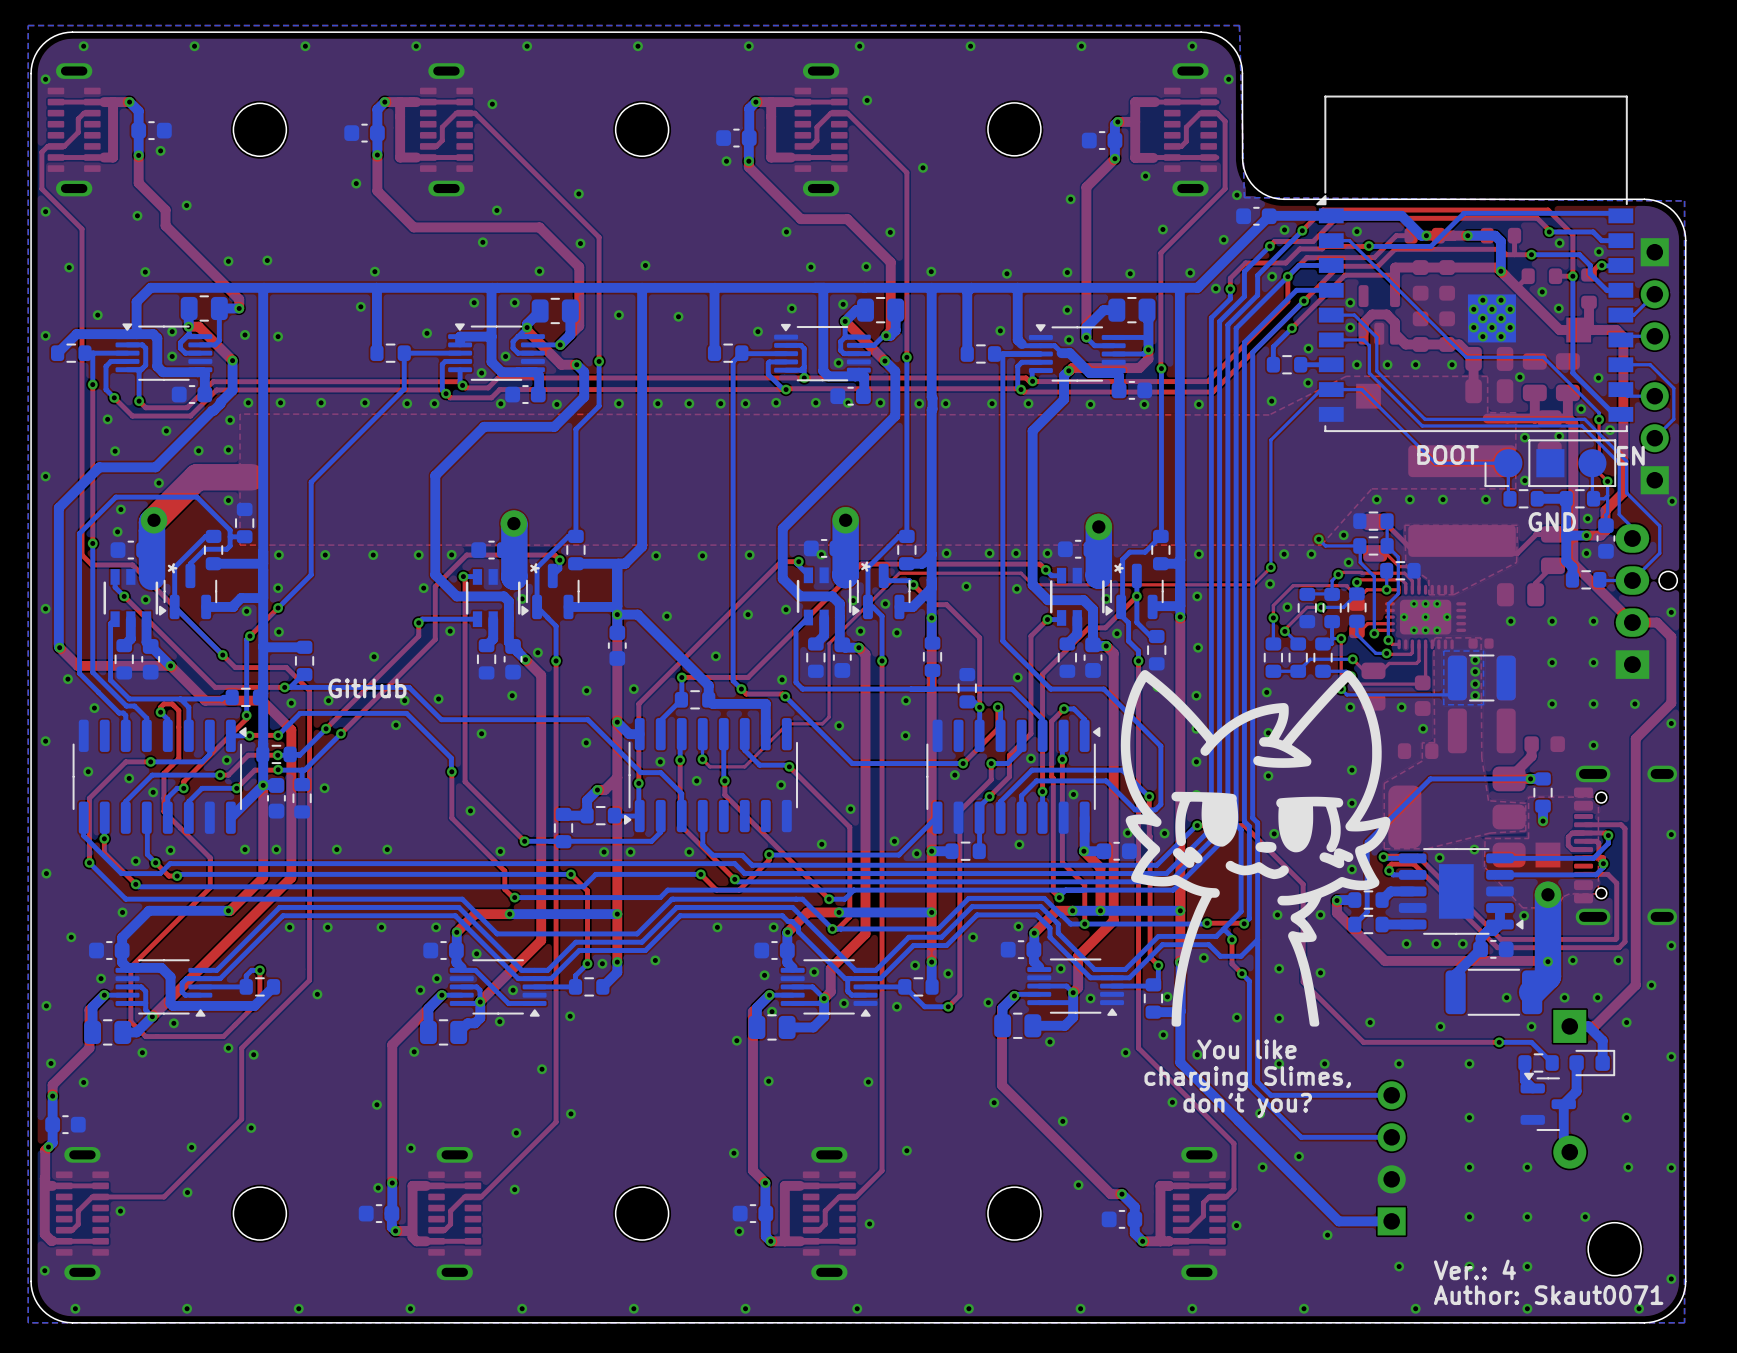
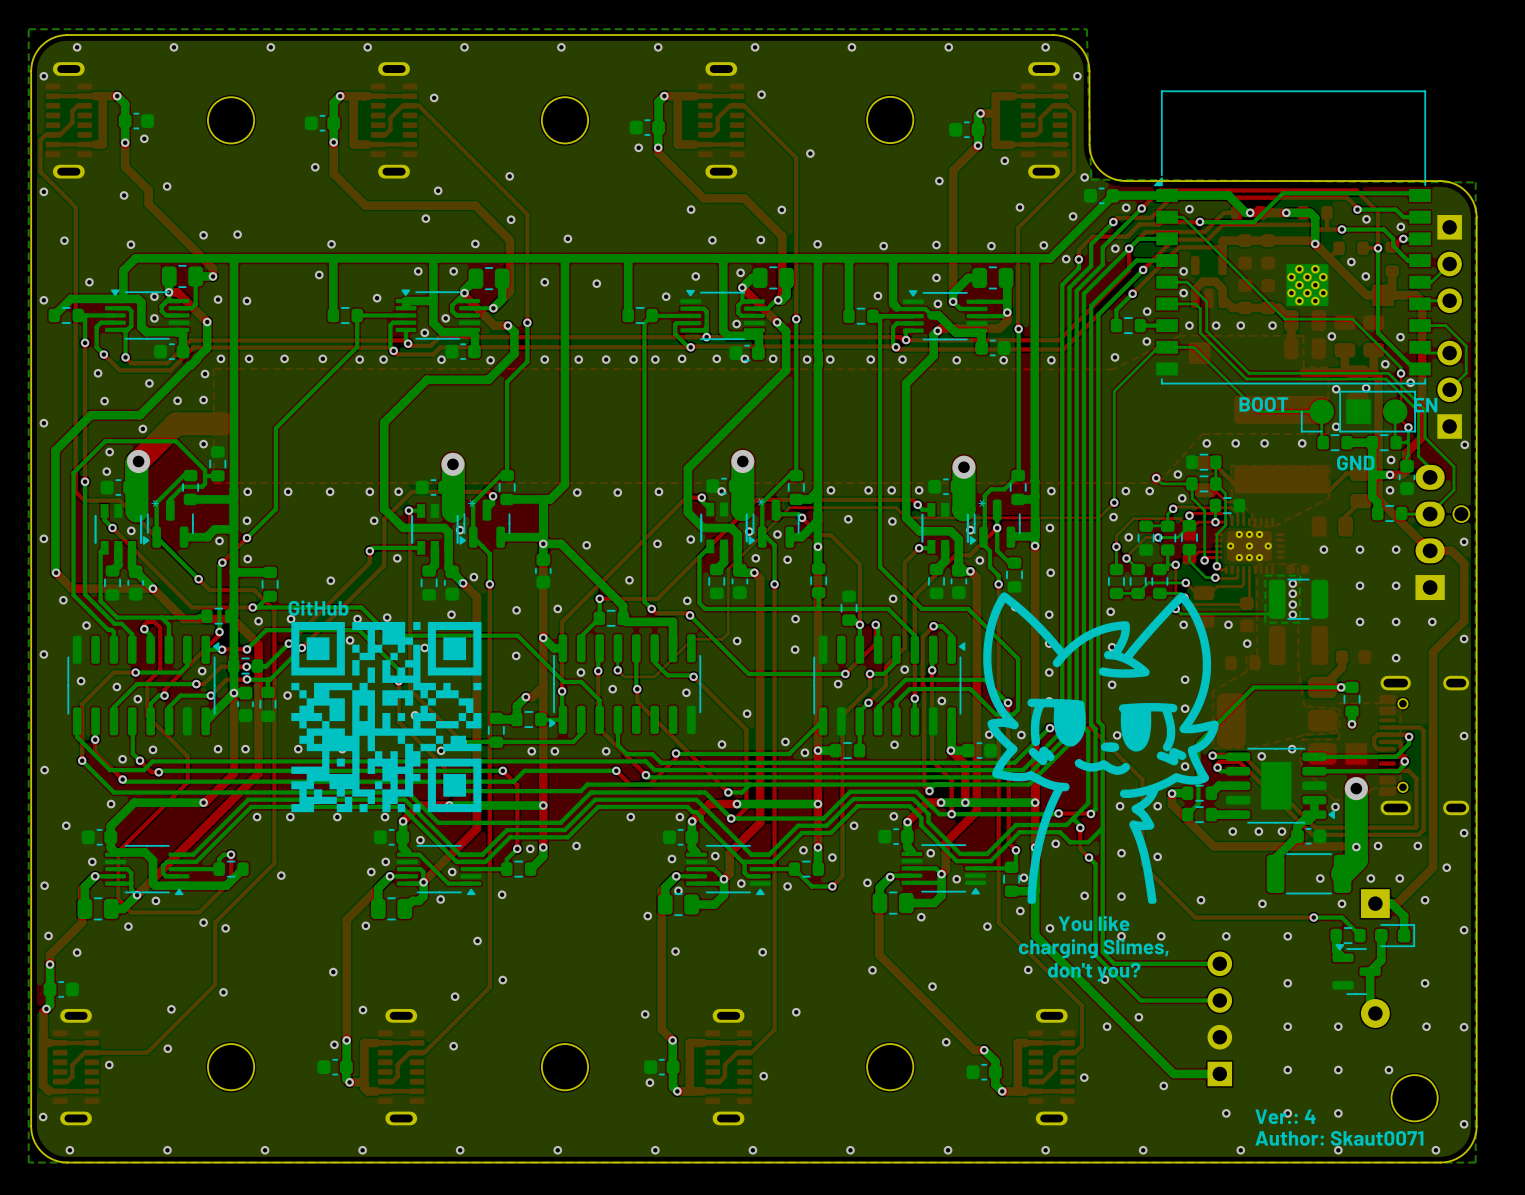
drawing: none -> [291, 621, 482, 813]

